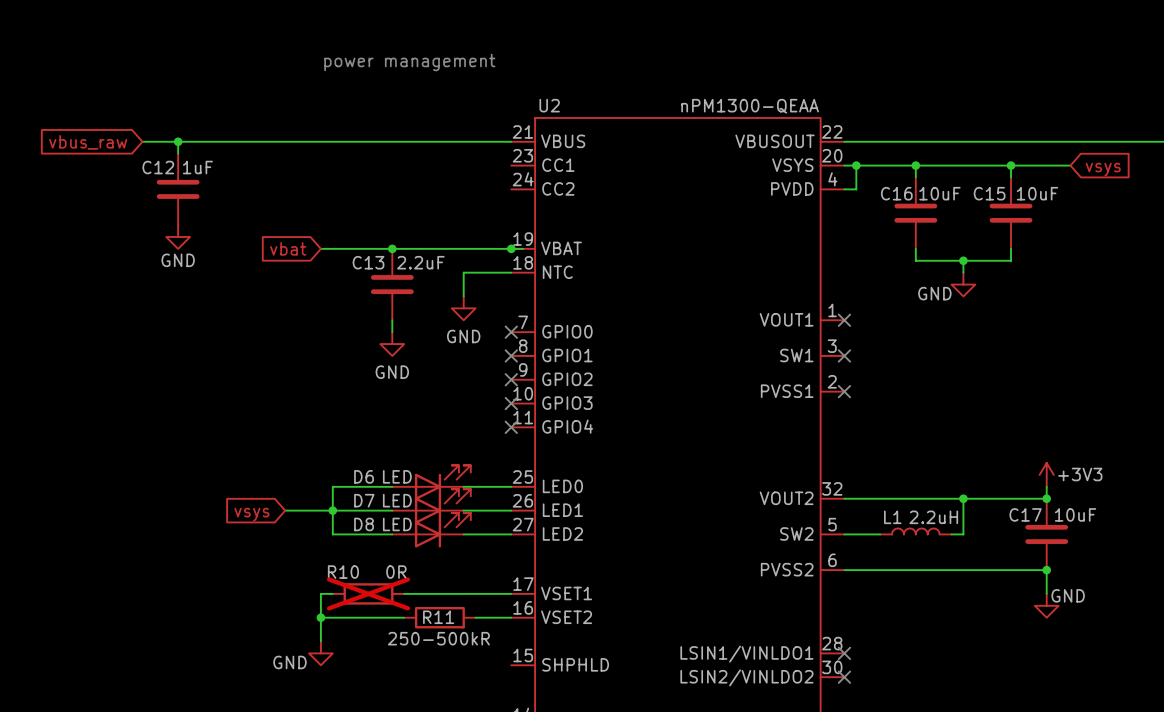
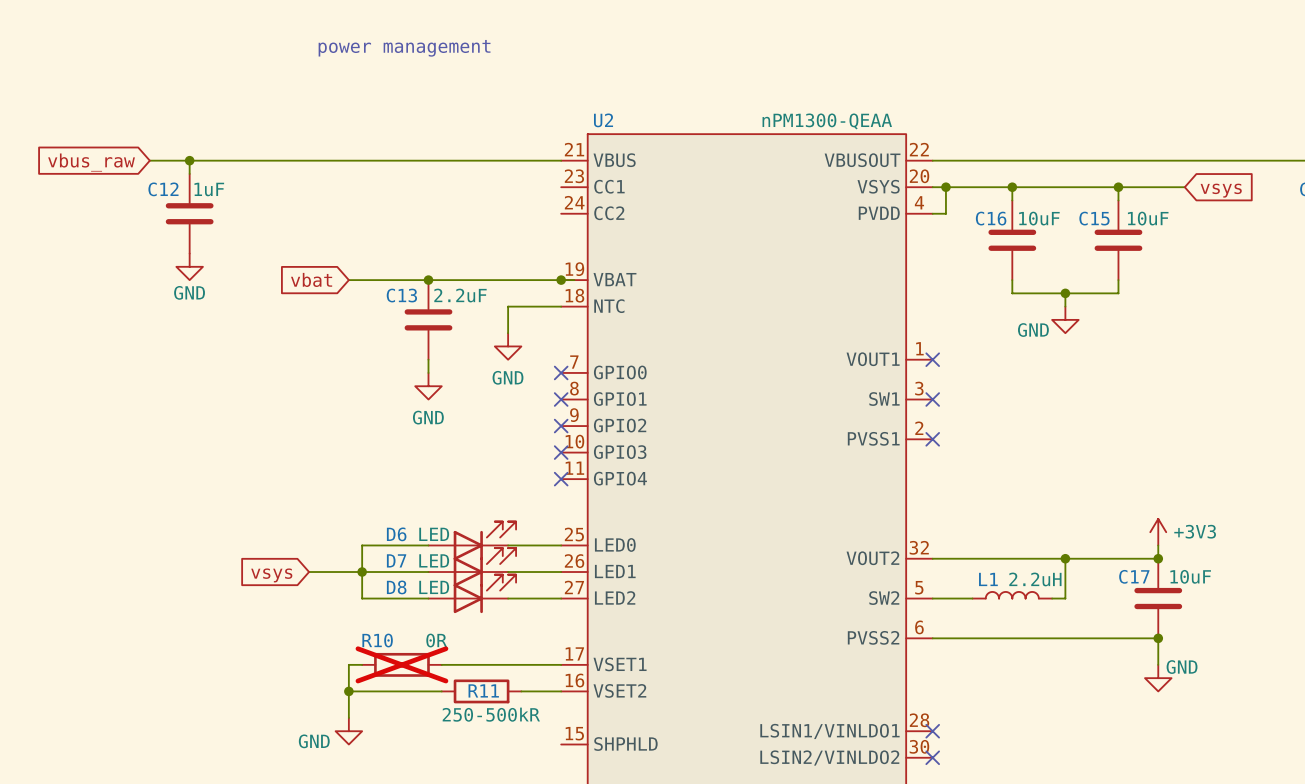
text position: power management (409, 62) -> power management (404, 48)

